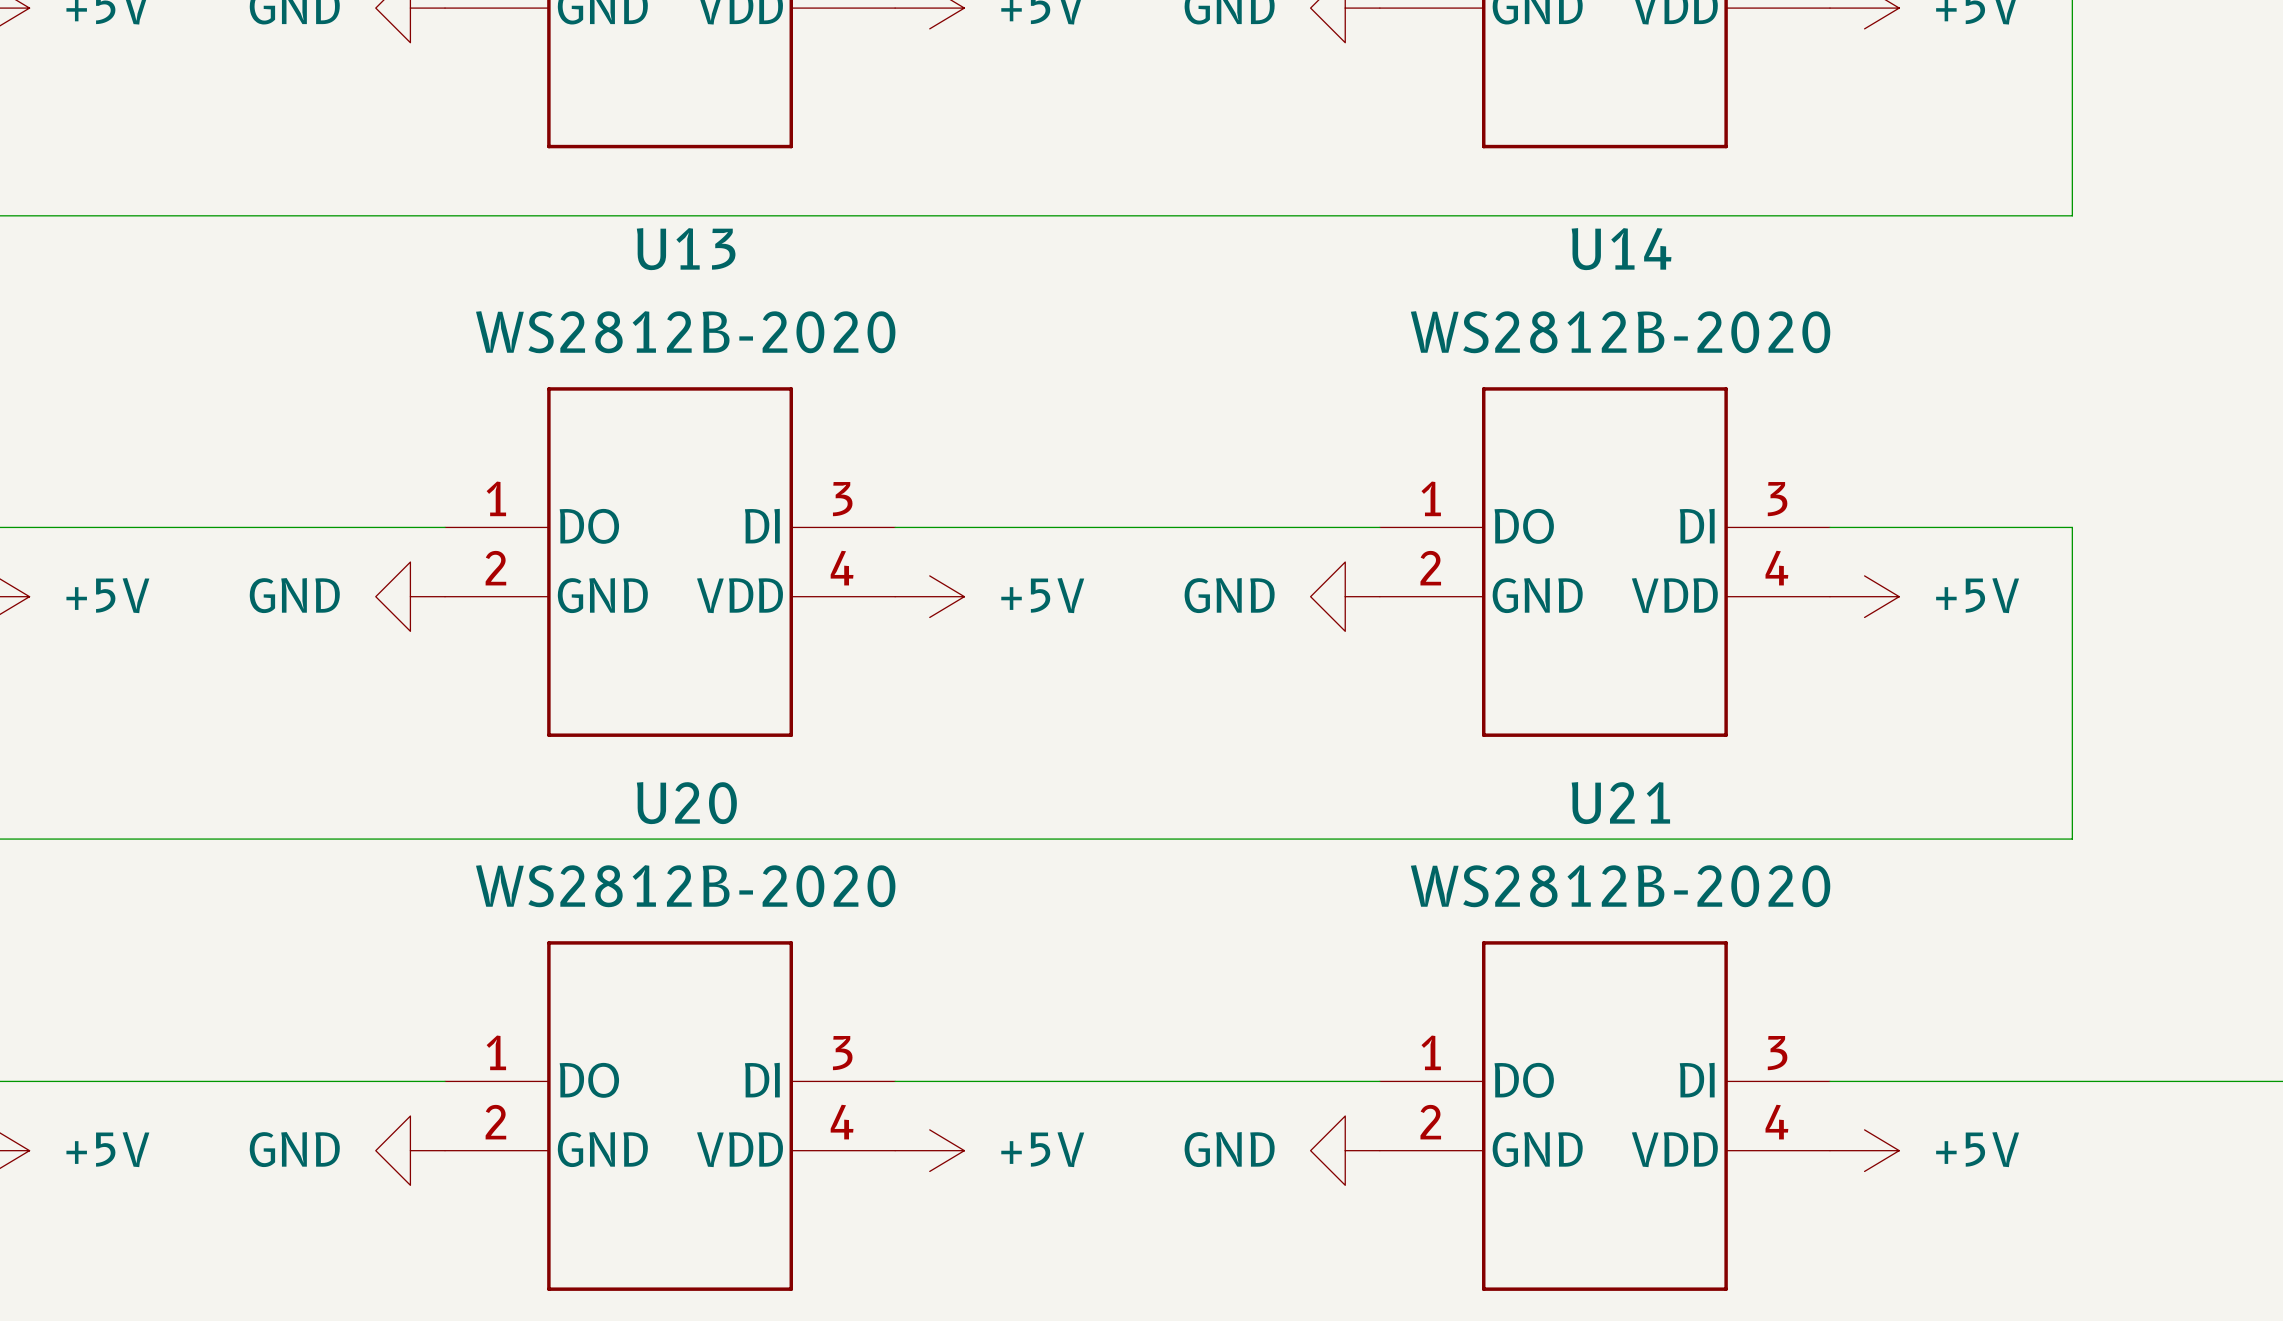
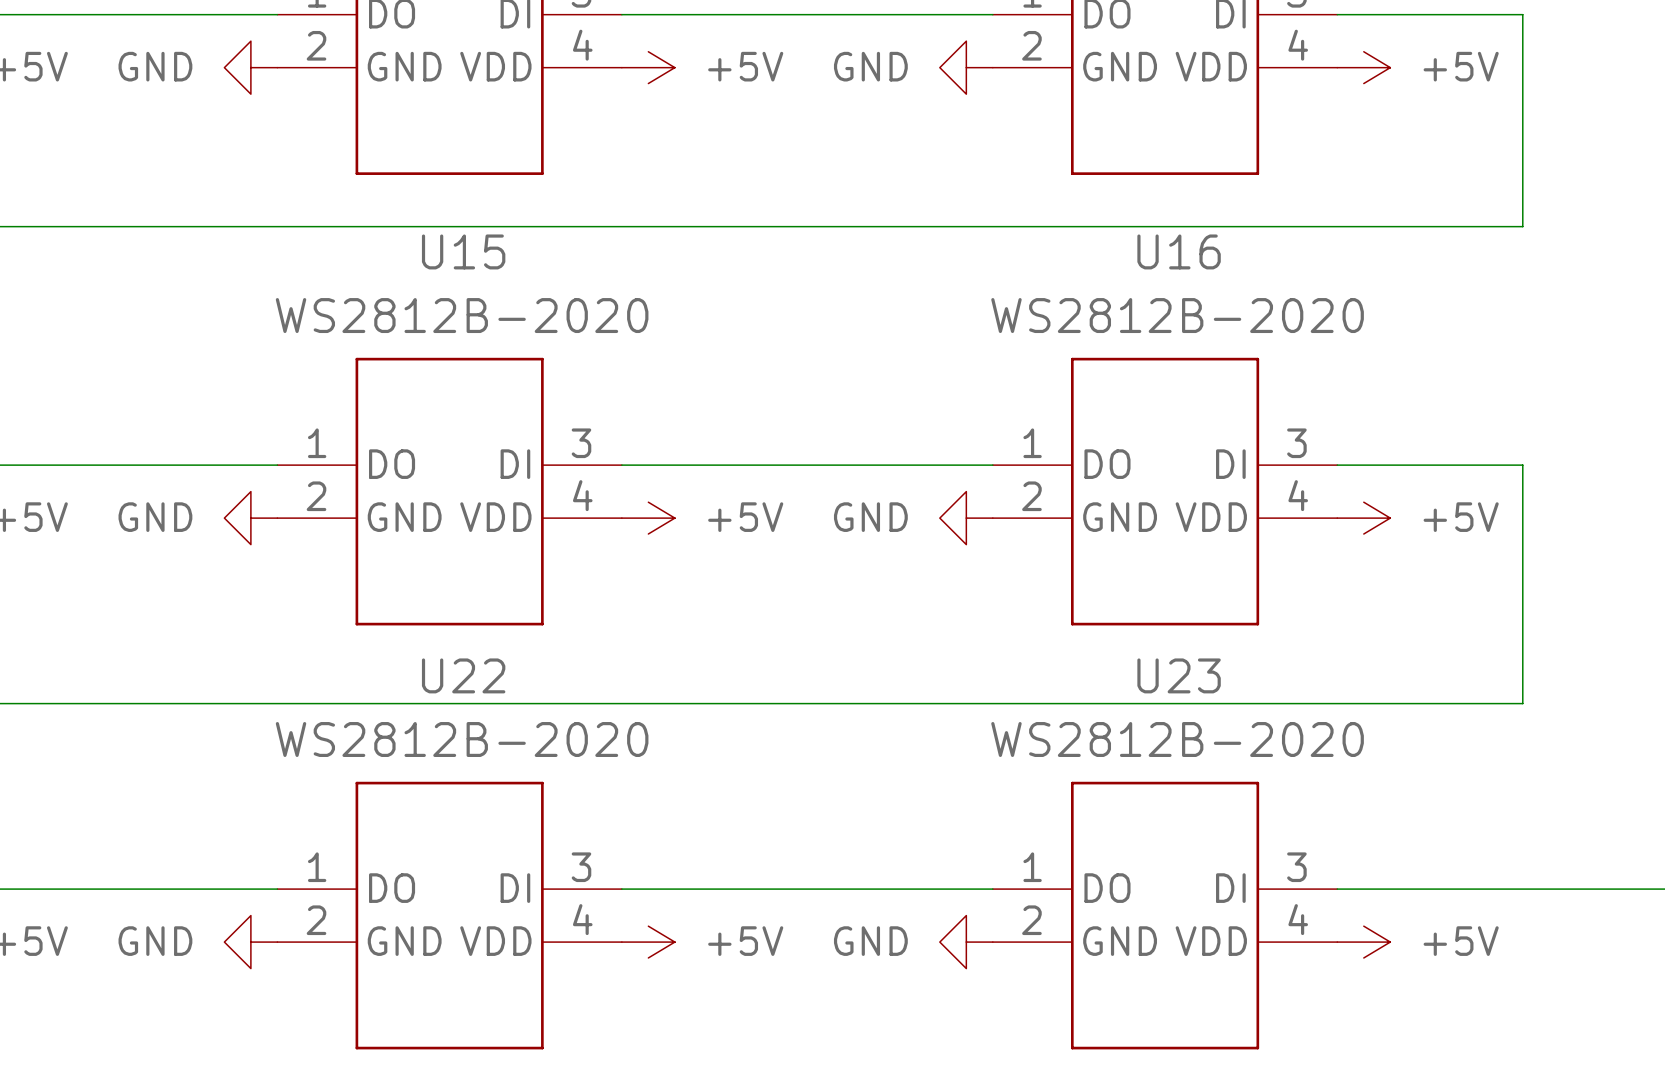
U13 name: U13 (686, 249) -> U15 (463, 251)
U14 name: U14 (1621, 249) -> U16 (1179, 251)
U20 name: U20 (686, 803) -> U22 (463, 675)
U21 name: U21 (1620, 803) -> U23 (1179, 675)

